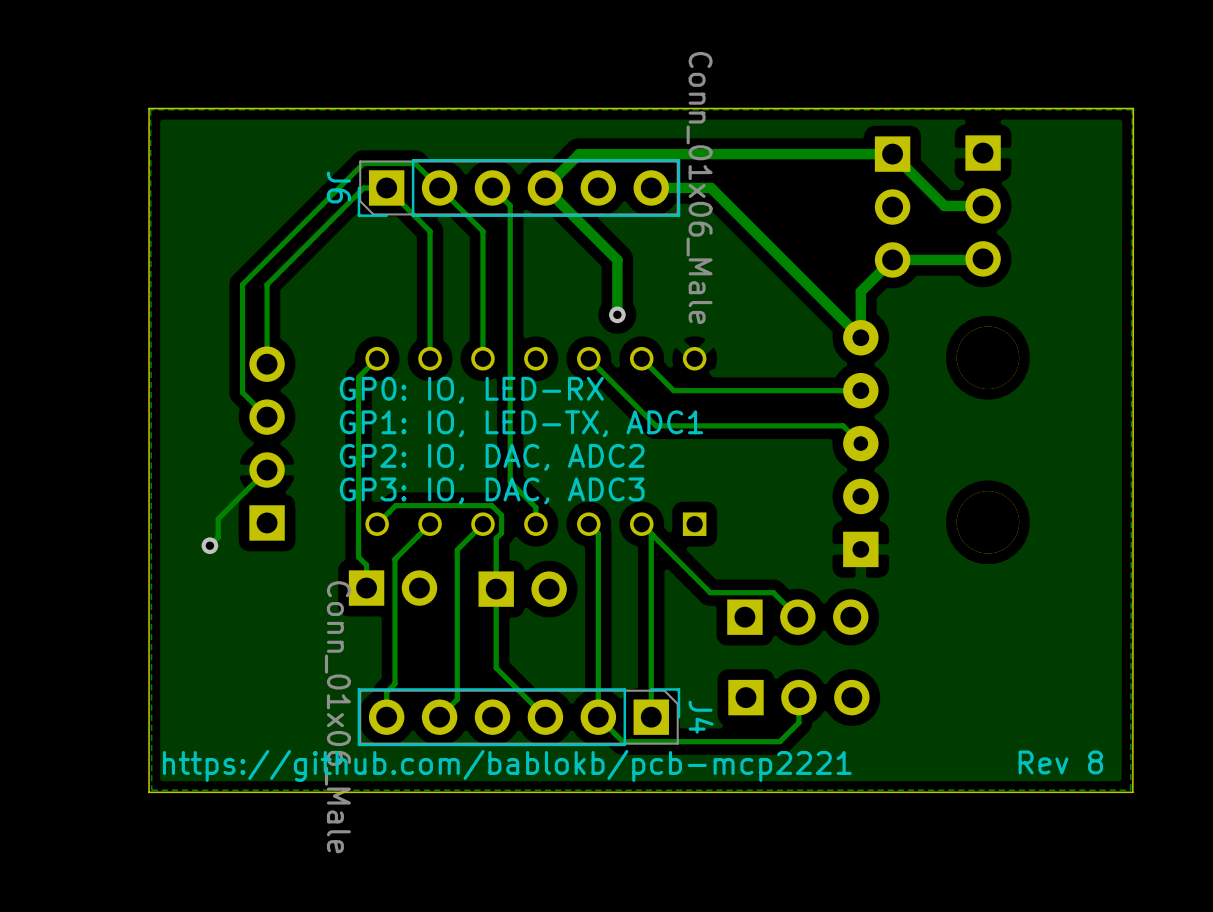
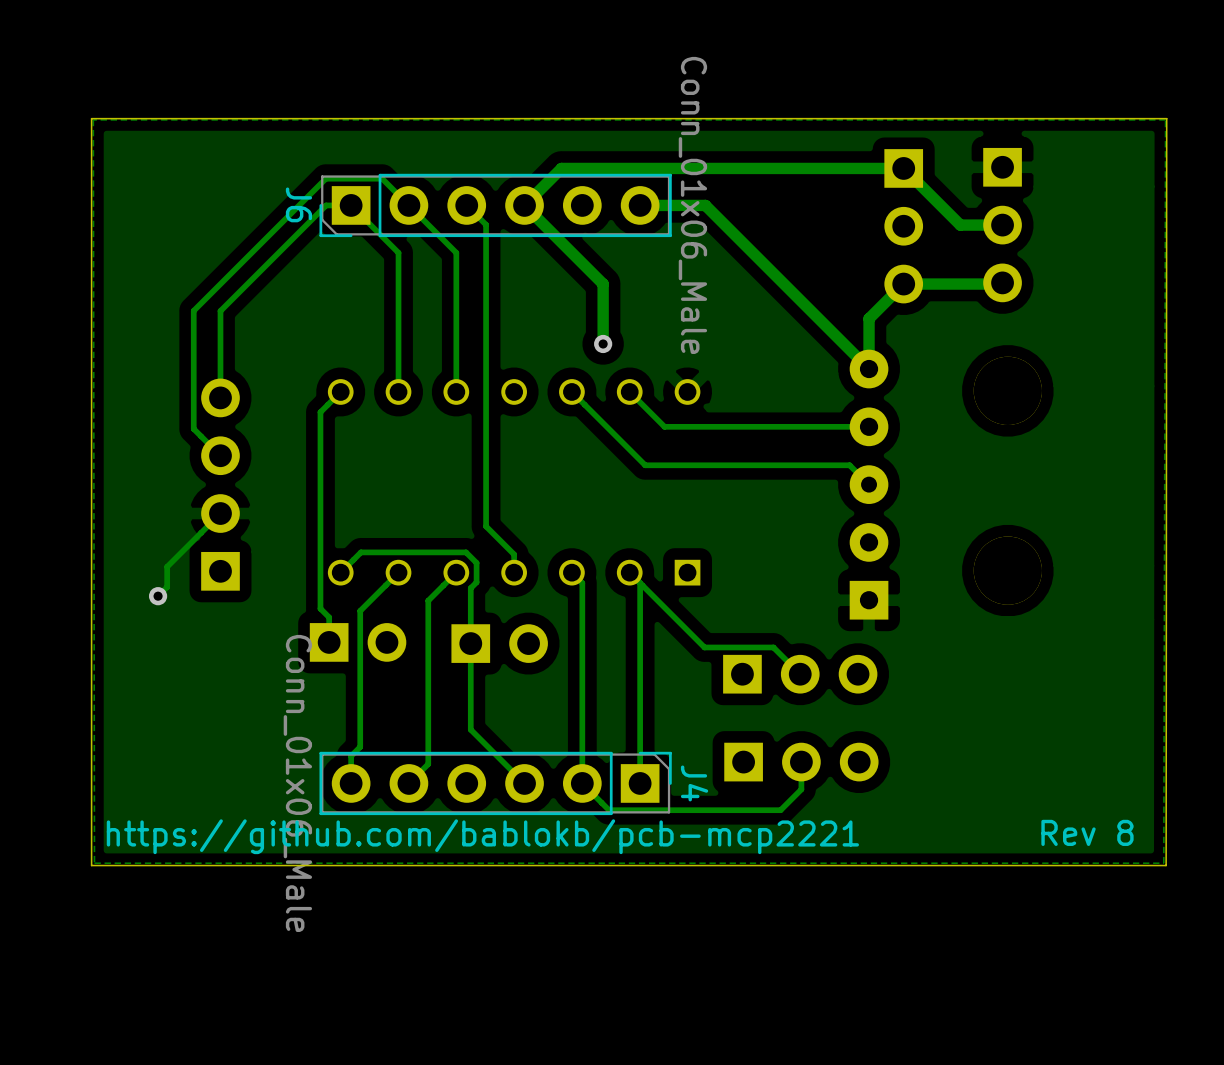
text: GP0: IO, LED-RX (471, 390) -> none
text: GP1: IO, LED-TX, ADC1 (521, 423) -> none
text: GP2: IO, DAC, ADC2 (492, 457) -> none
text: GP3: IO, DAC, ADC3 (492, 490) -> none

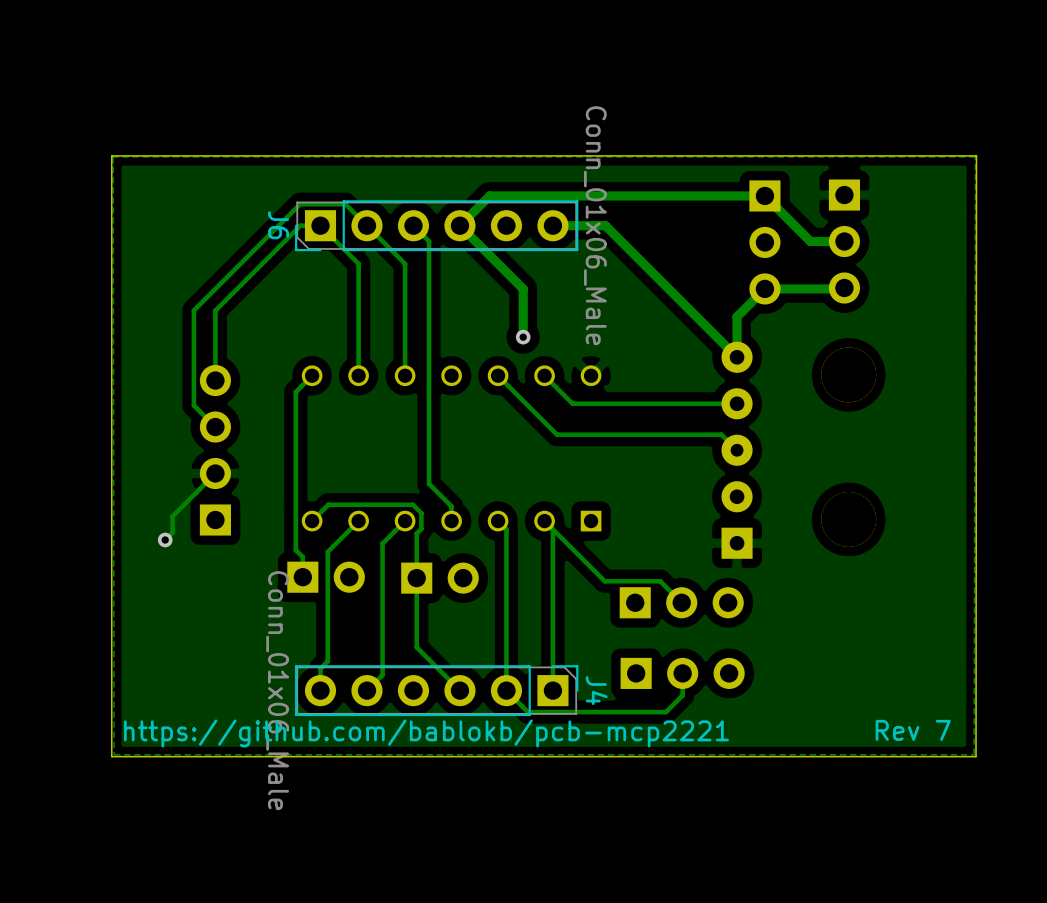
text: Rev 8 (1087, 832) -> Rev 7 (913, 730)

